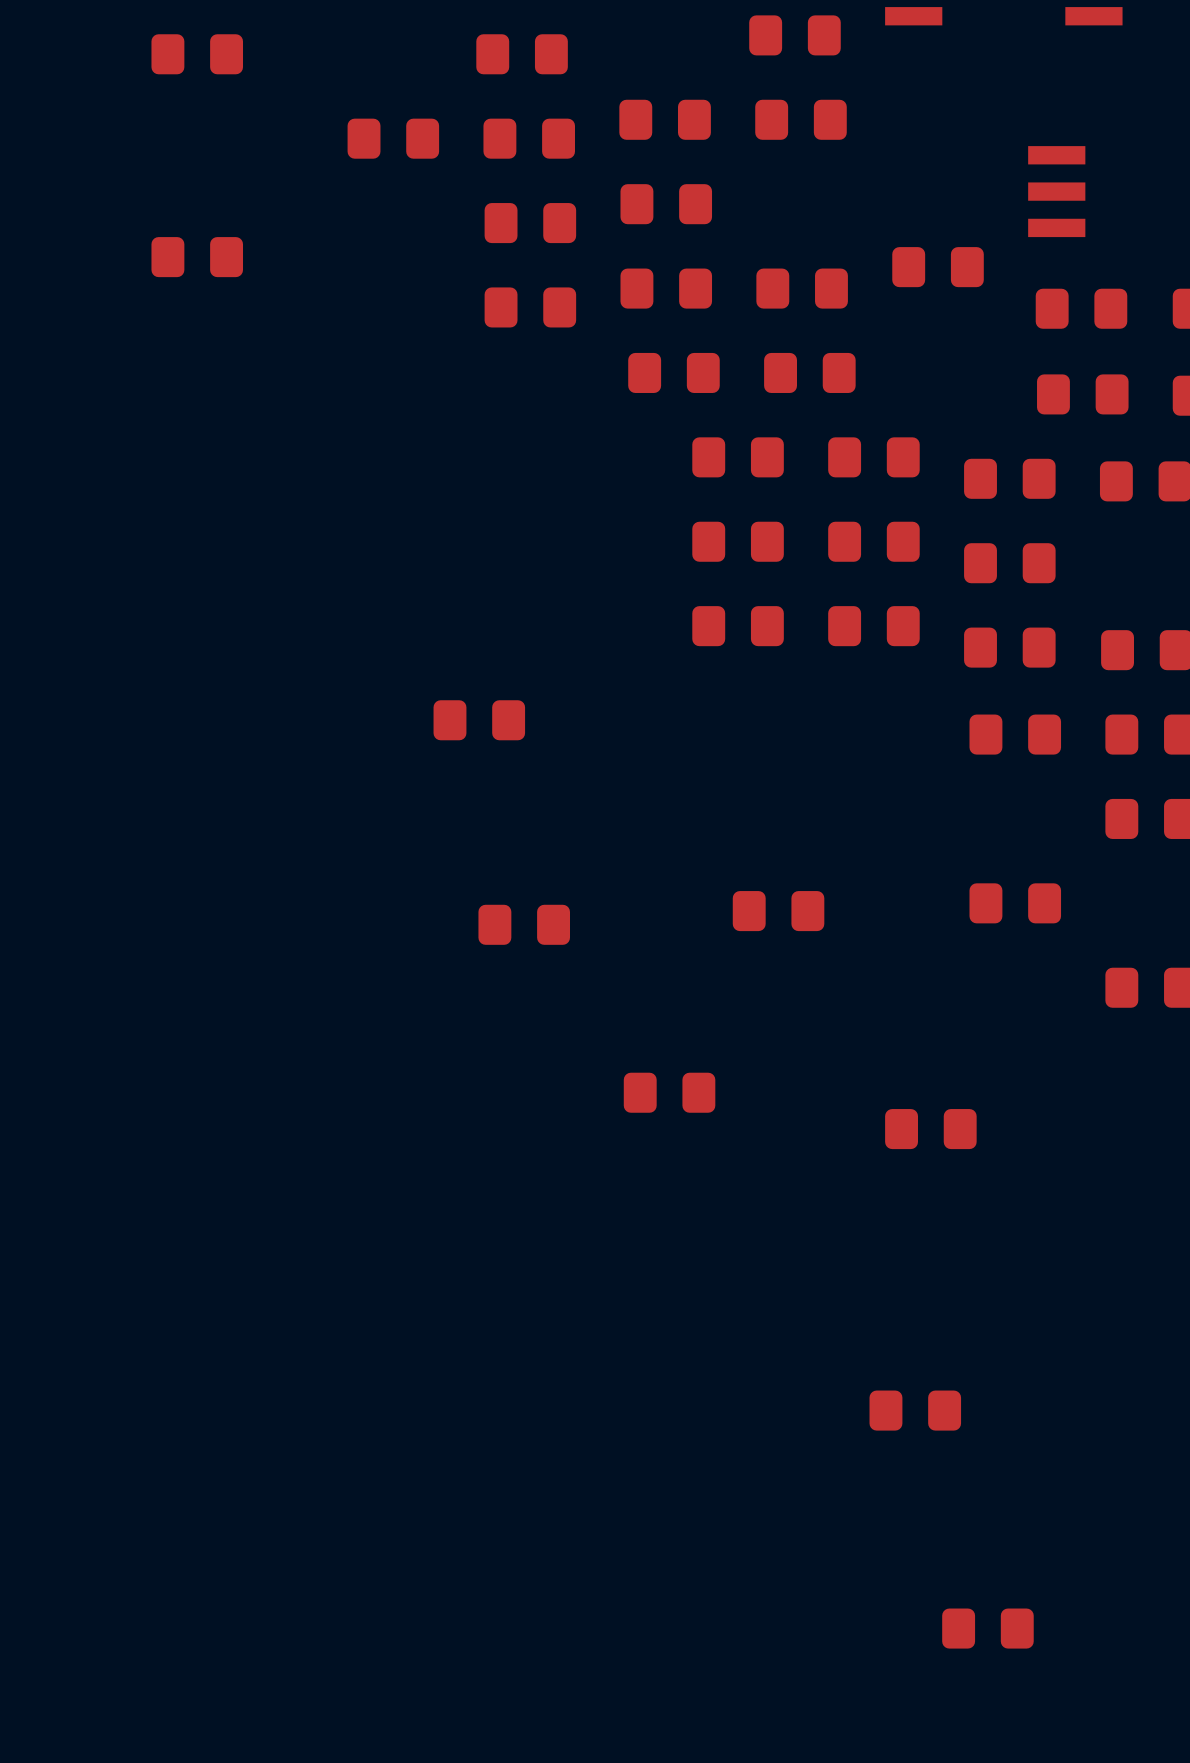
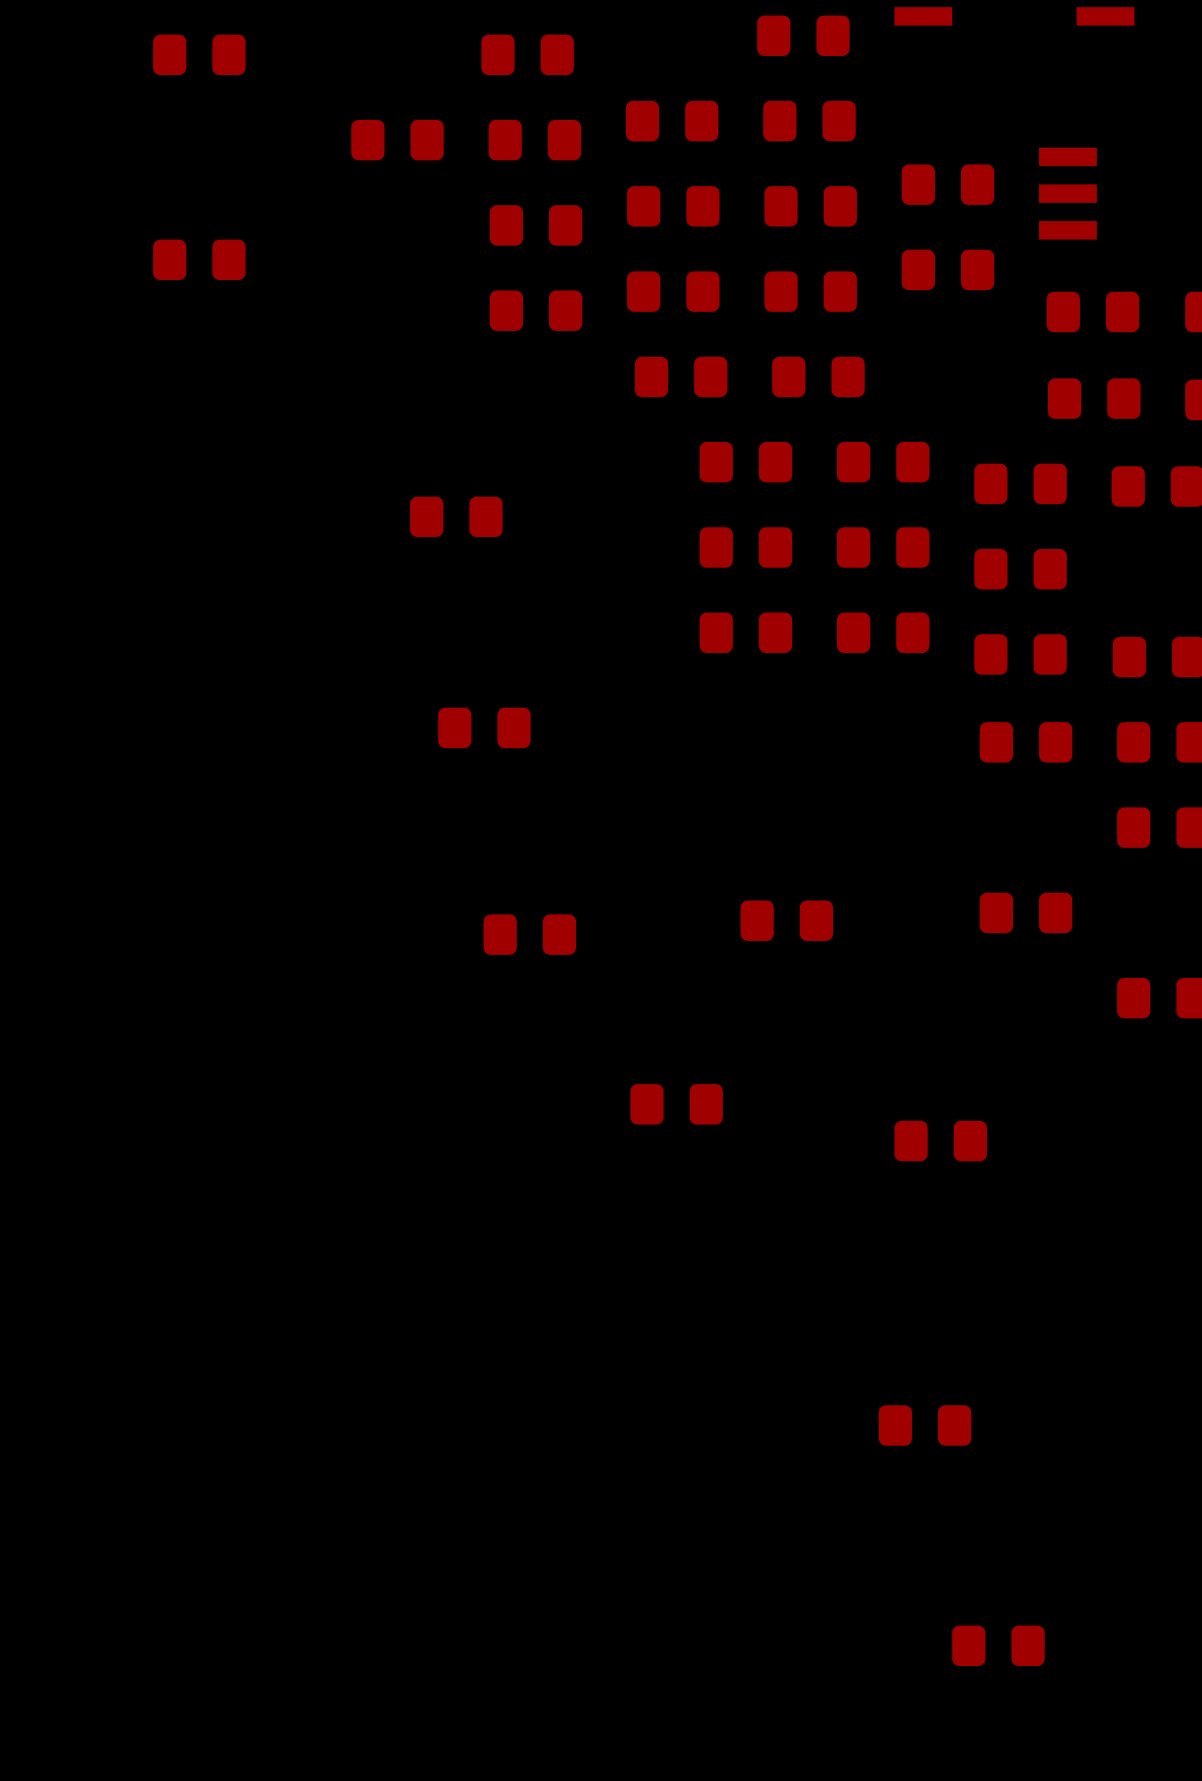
part: none -> (947, 184)
part: none -> (810, 206)
part: none -> (456, 516)

